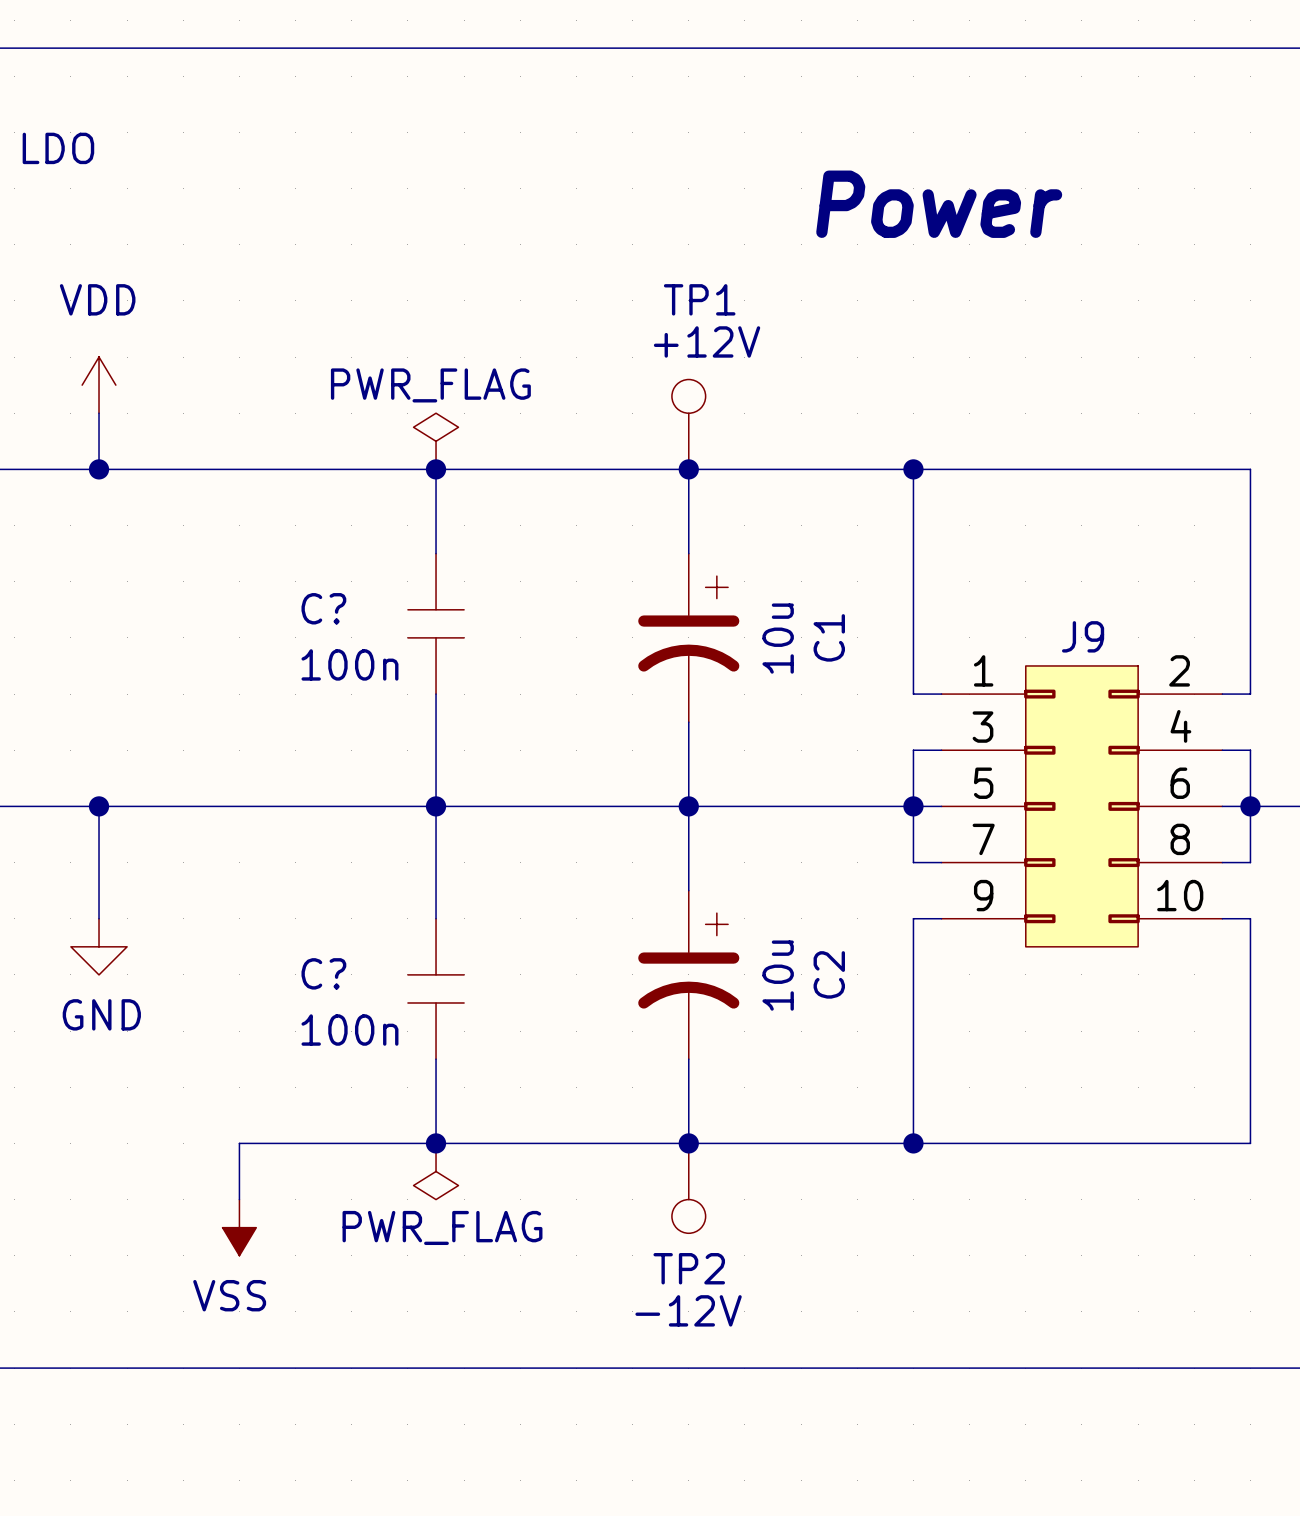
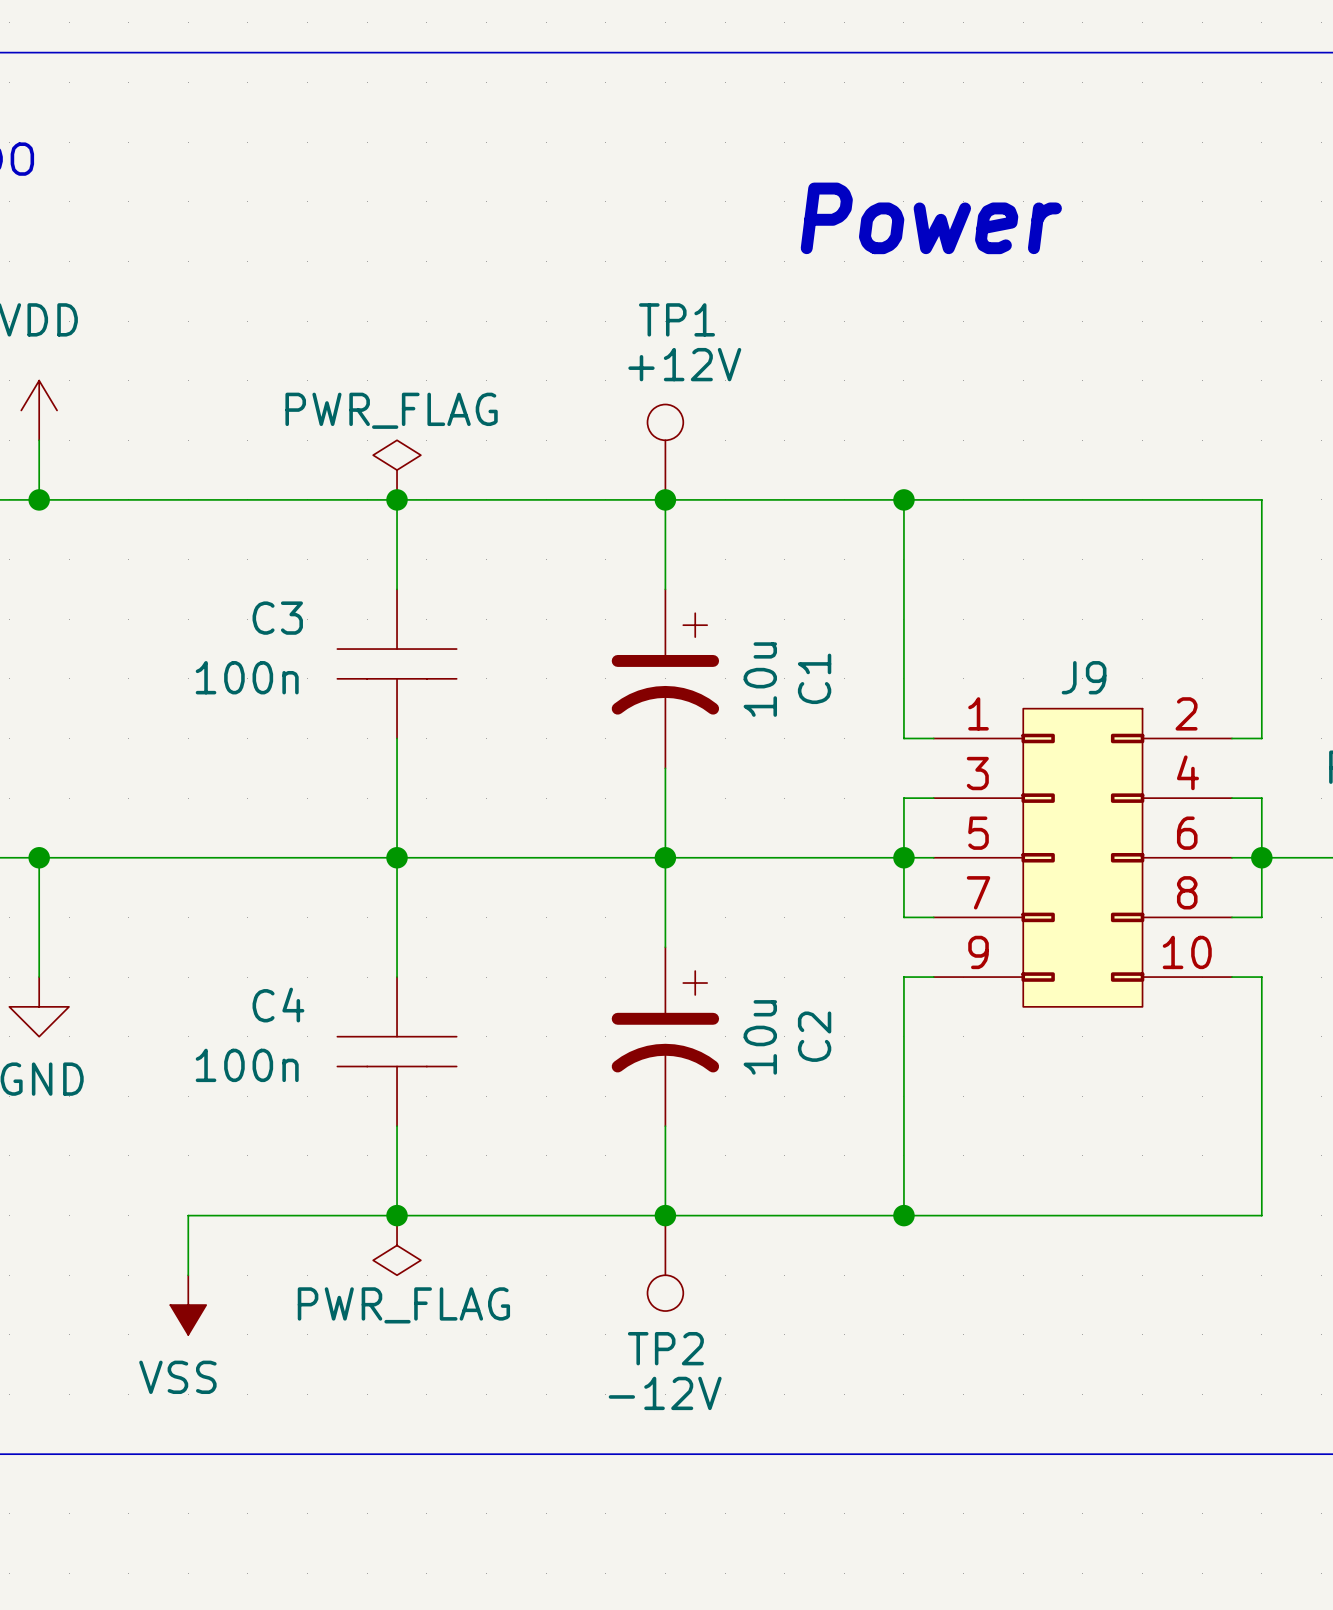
C?: (436, 623) -> none
C3: none -> (397, 663)
C?: (436, 988) -> none
C4: none -> (397, 1051)

